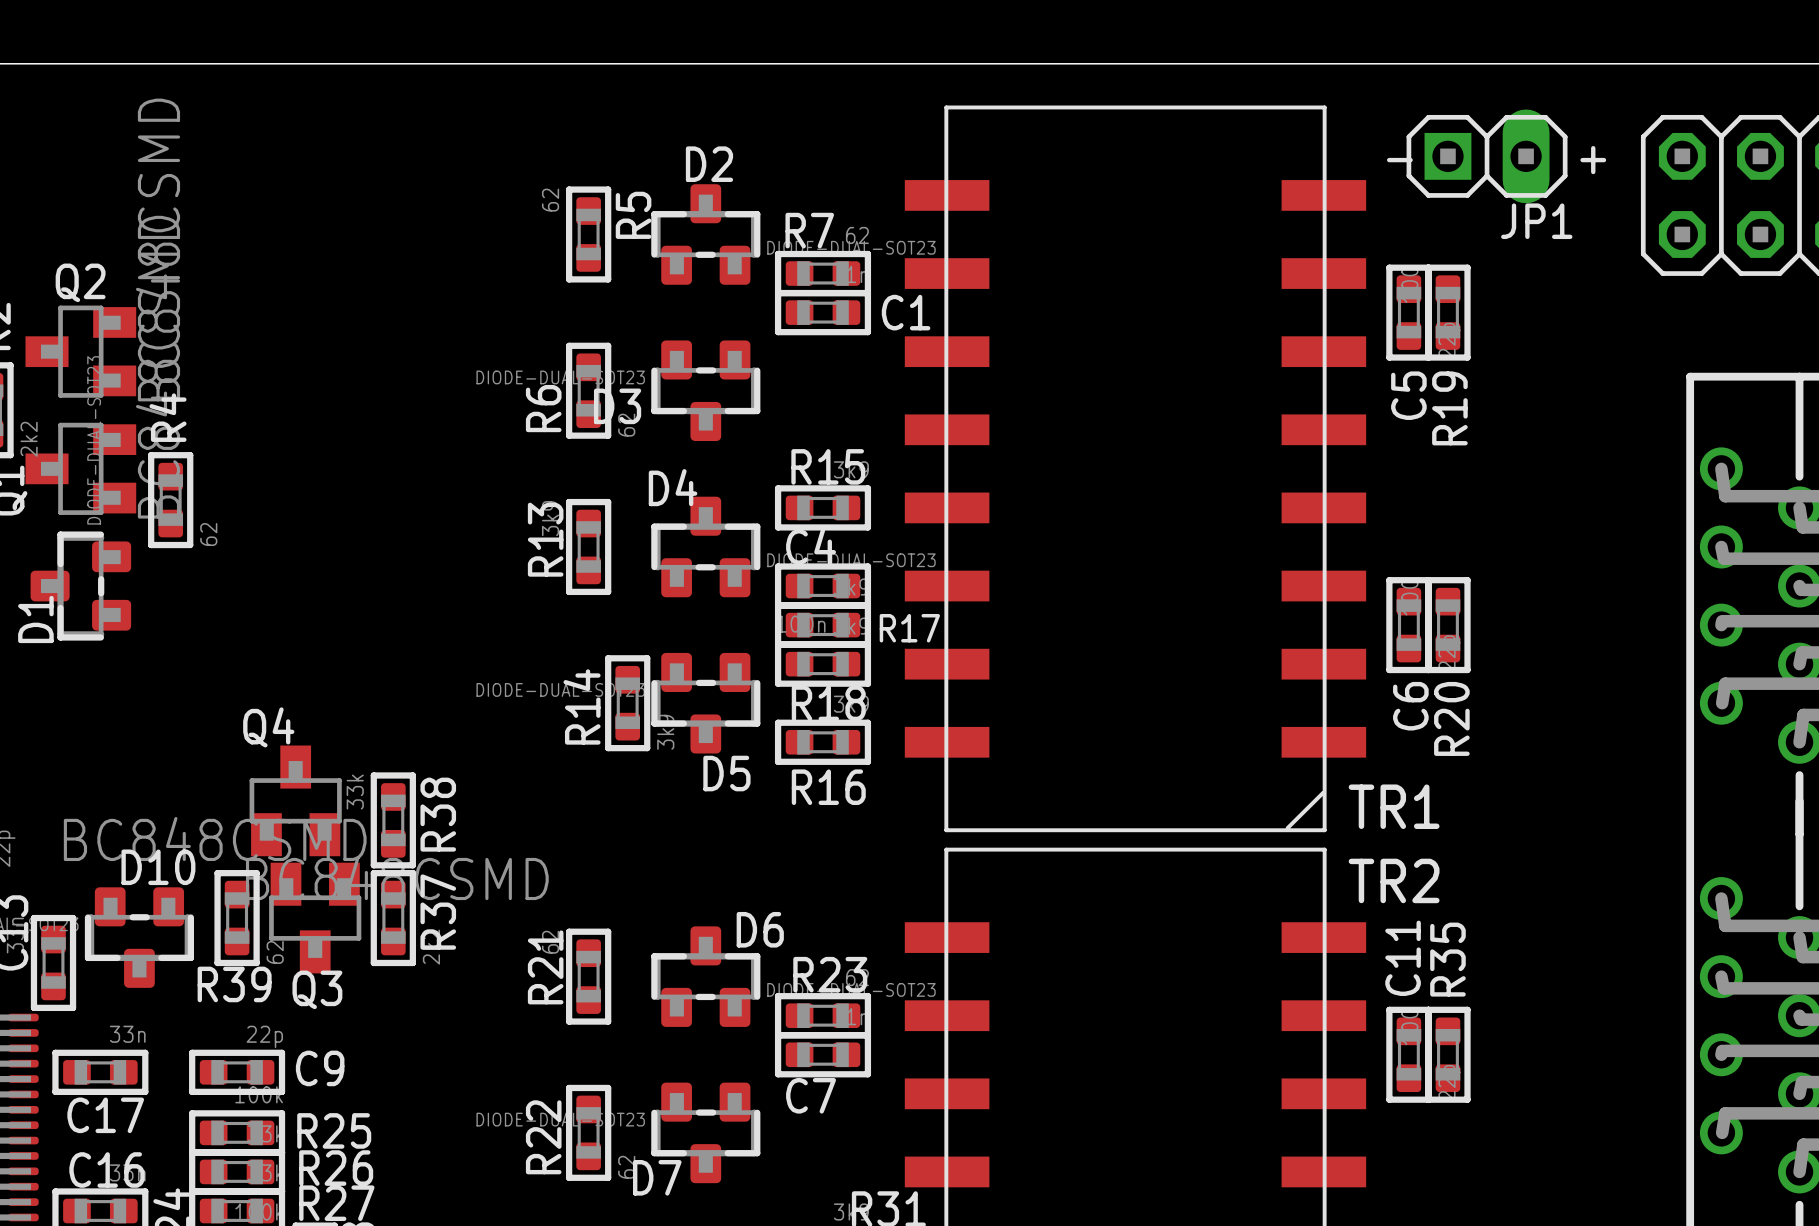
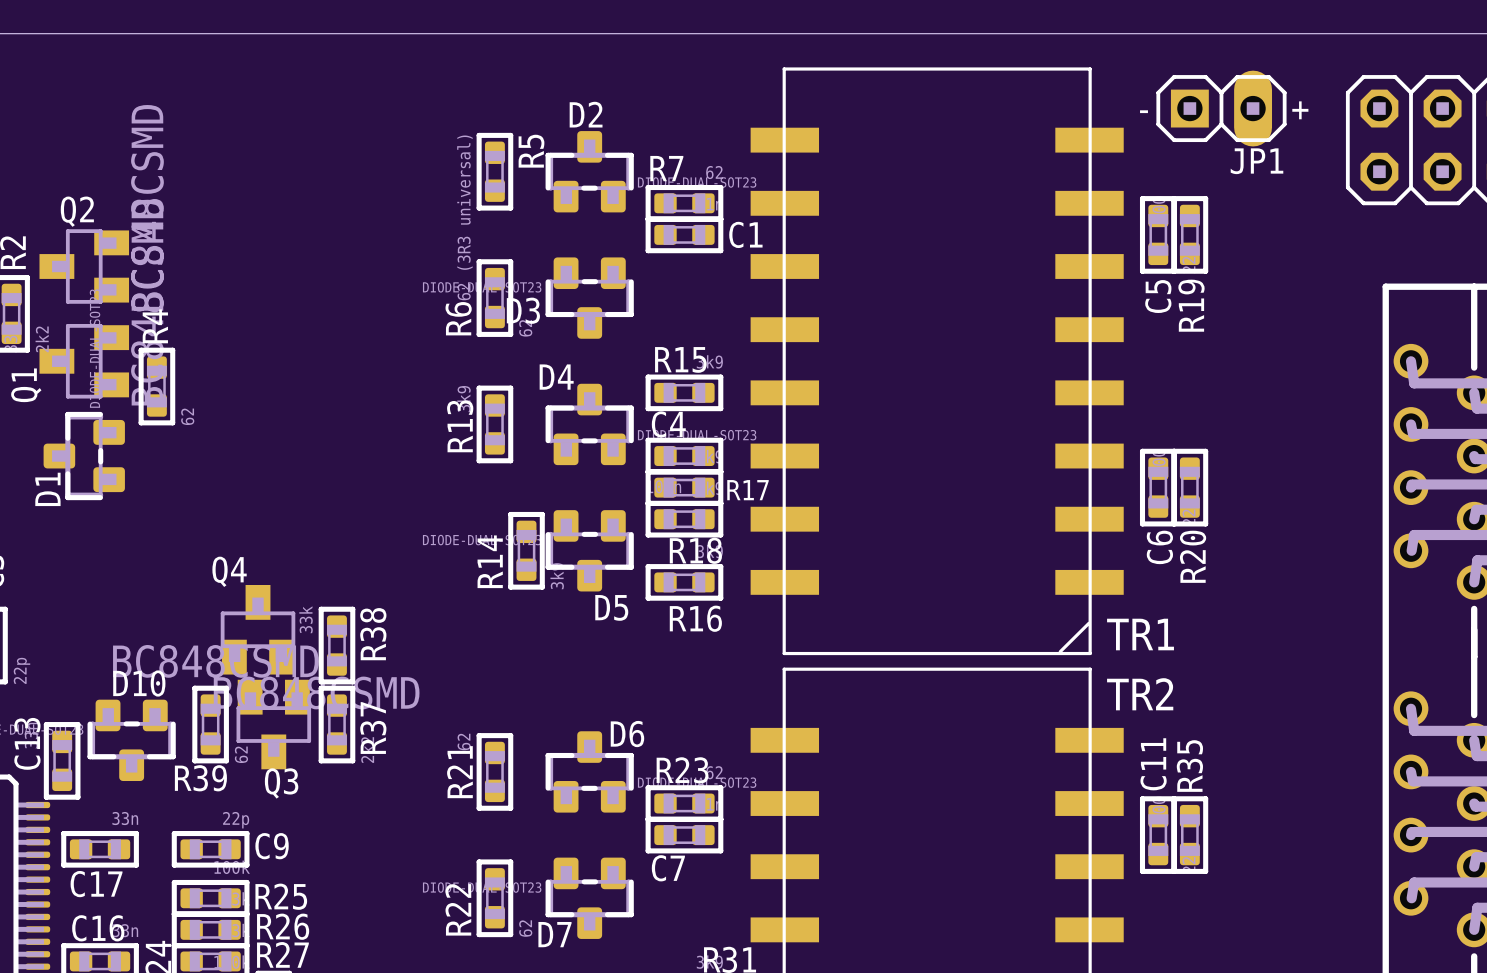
R5 value: 62 (550, 200) -> 62 (3R3 universal) (464, 217)

